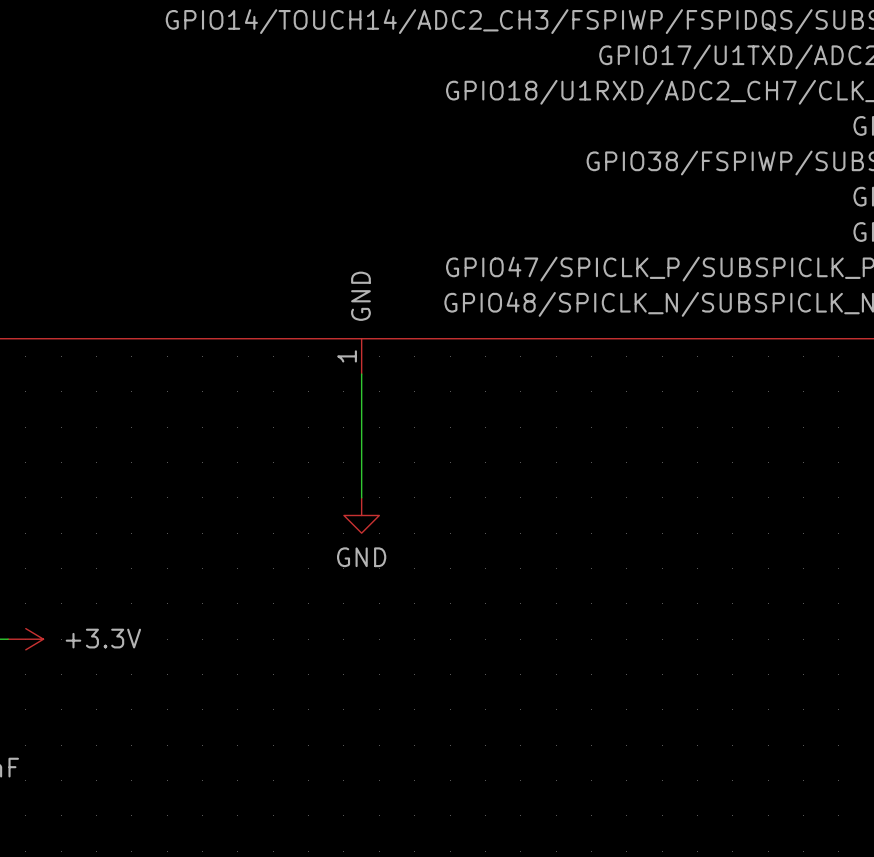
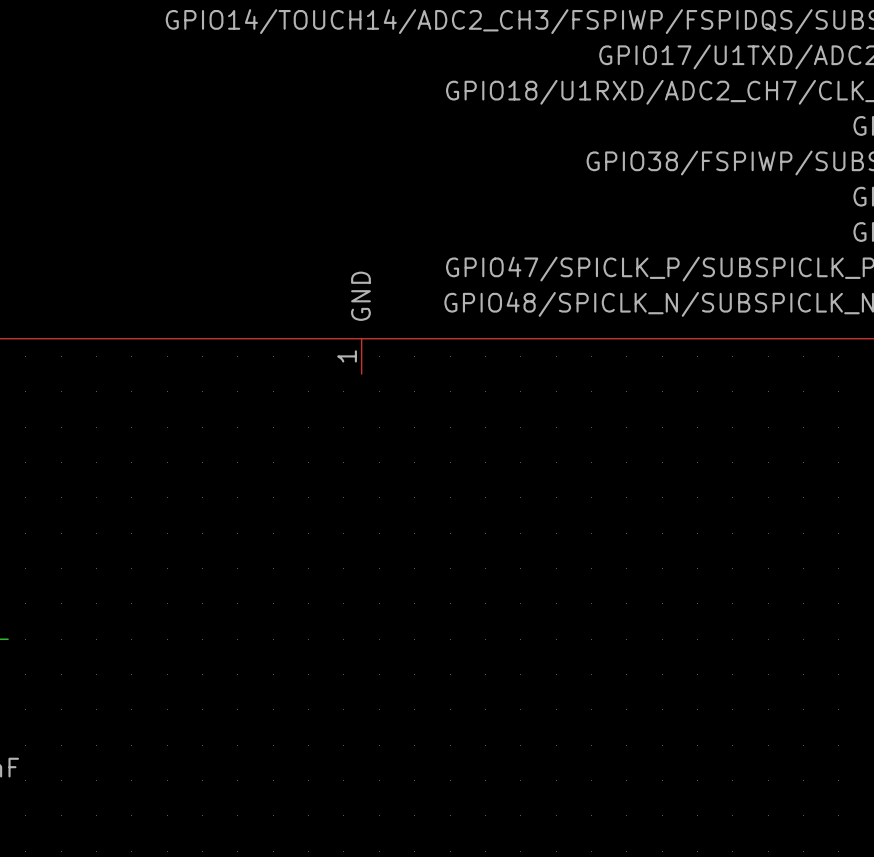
wire: (361, 374) (361, 497) -> none
power symbol: GND (361, 515) -> none
power symbol: +3.3V (25, 639) -> none

